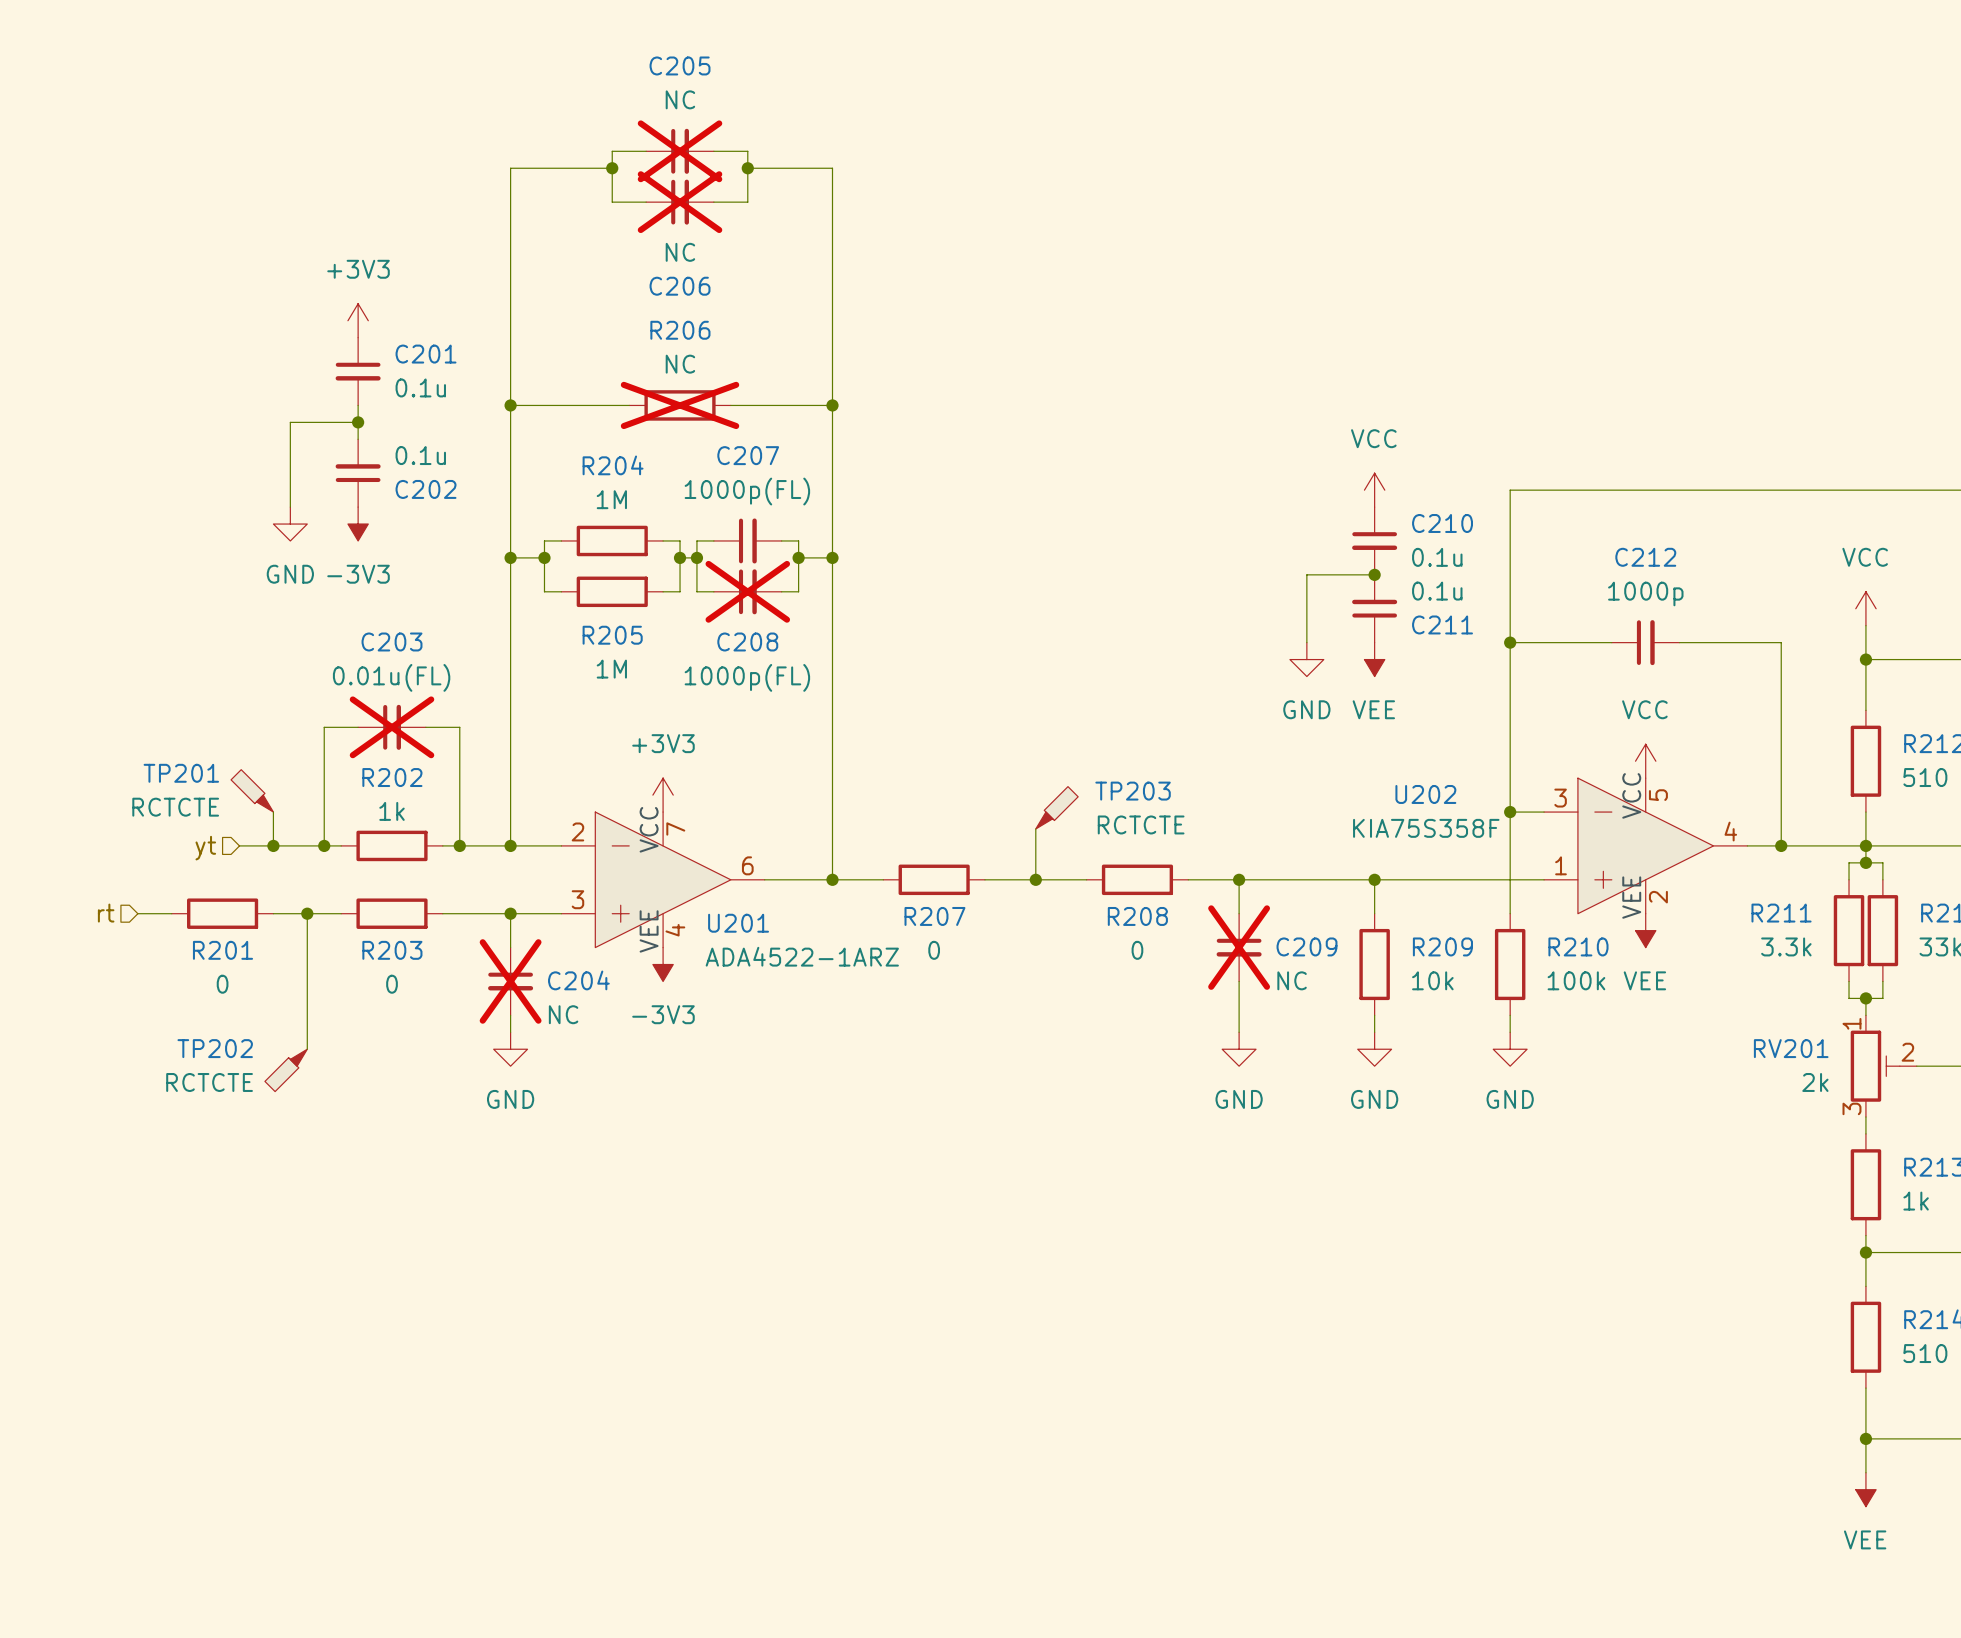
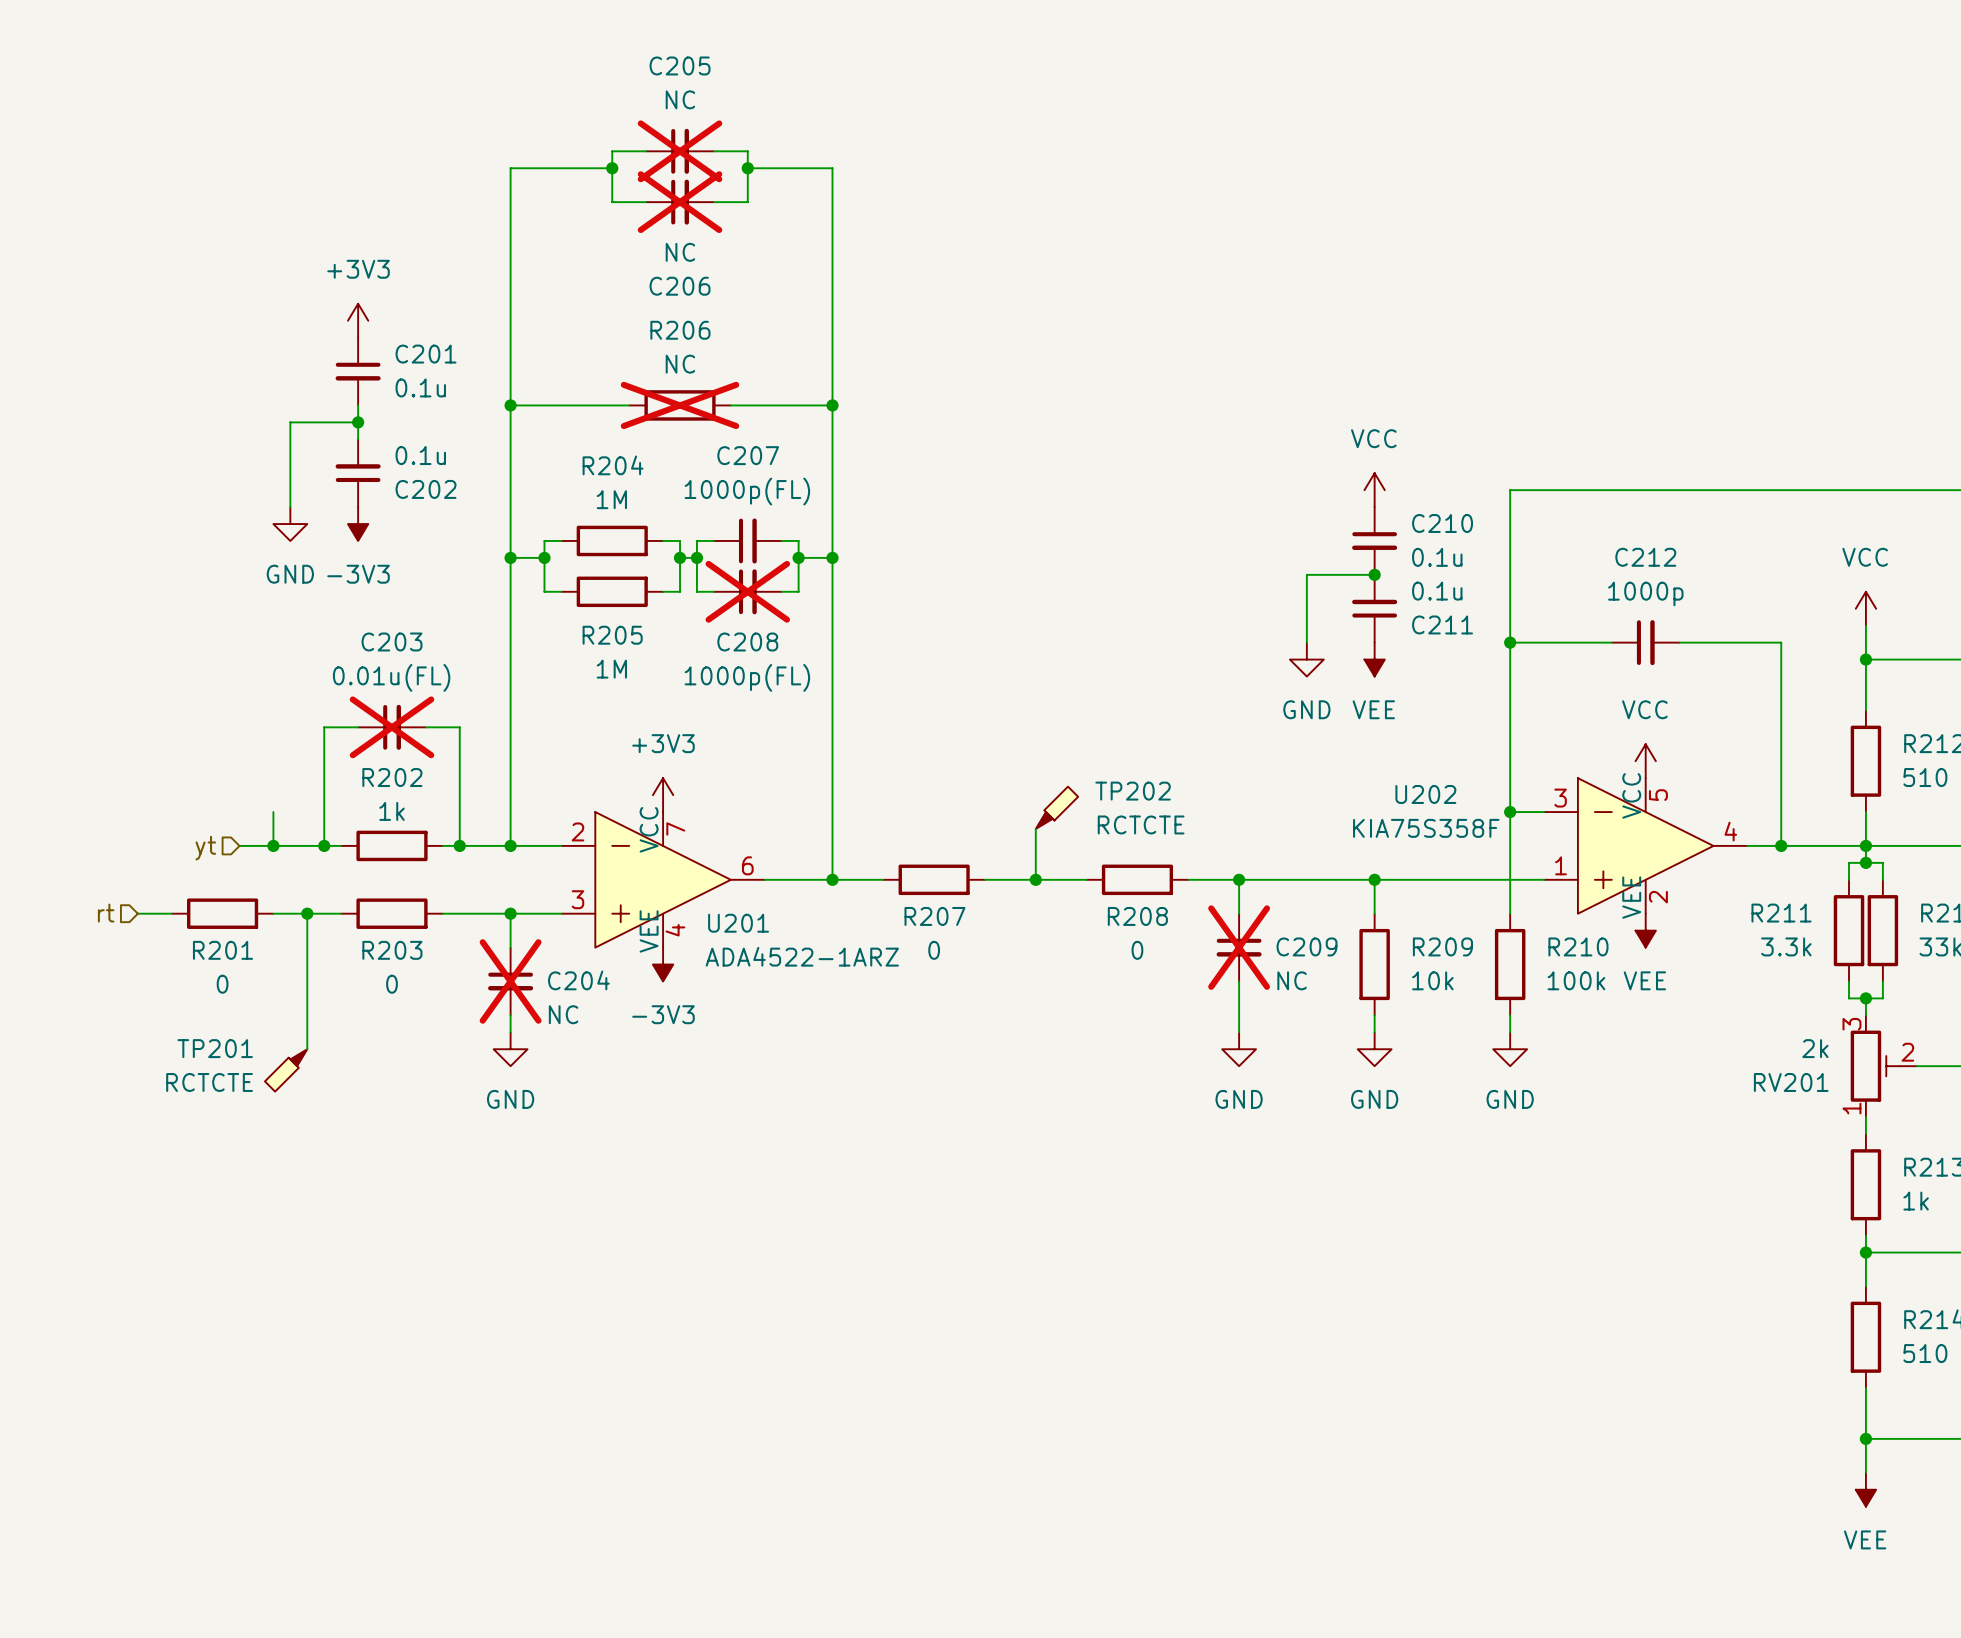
TP201: RCTCTE (252, 790) -> none
TP203 name: TP203 (1133, 791) -> TP202 (1133, 791)
TP202 name: TP202 (215, 1048) -> TP201 (215, 1048)
RV201 flip: as is (1875, 1066) -> up-down (1875, 1066)

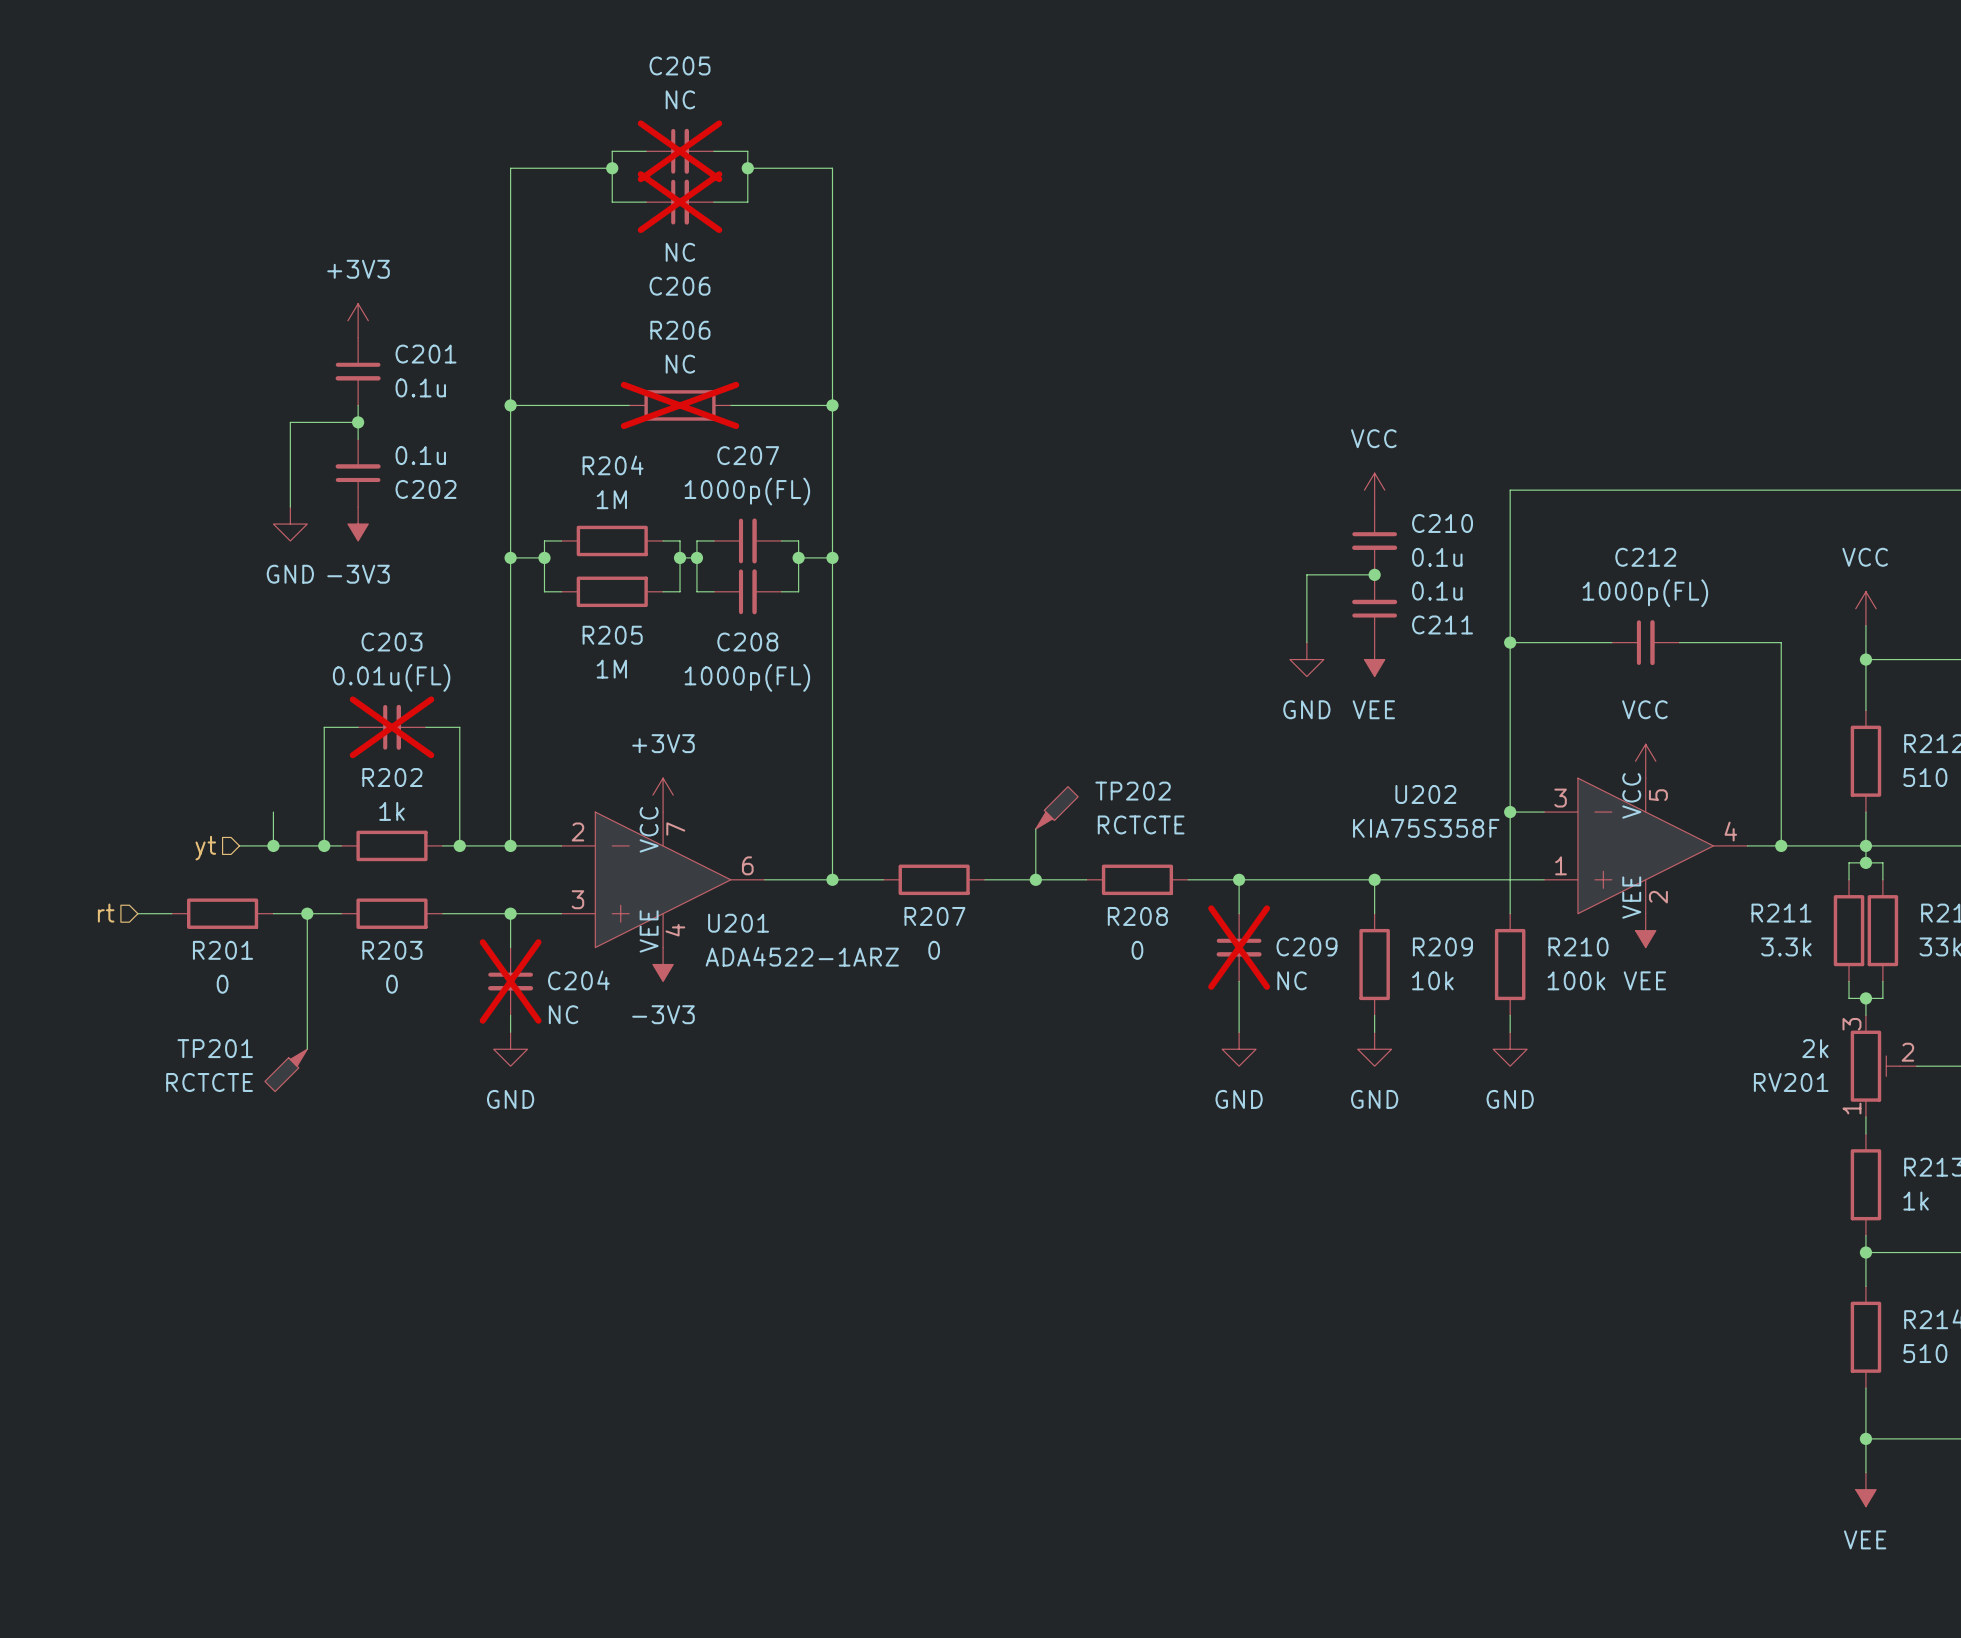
C208 do-not-place cross: (747, 591) -> none
C212 value: 1000p (1645, 593) -> 1000p(FL) (1645, 593)

